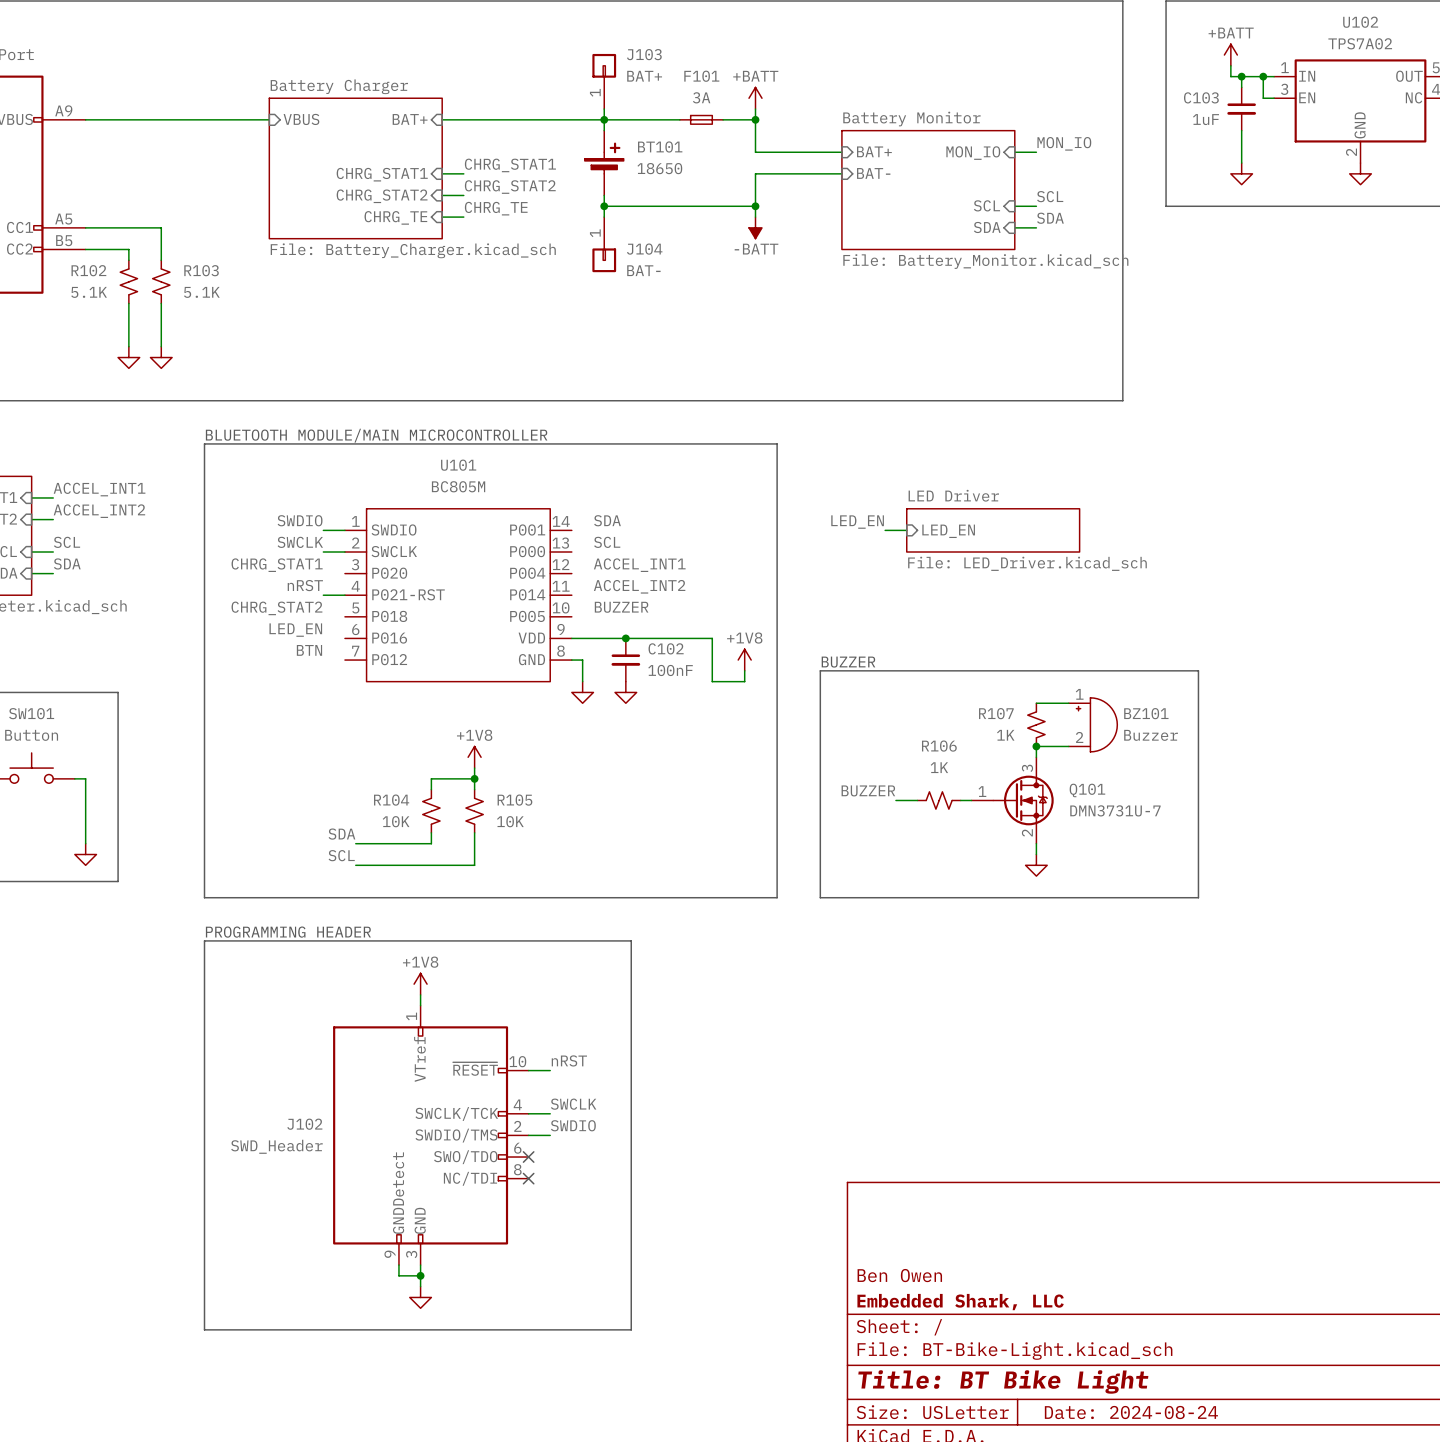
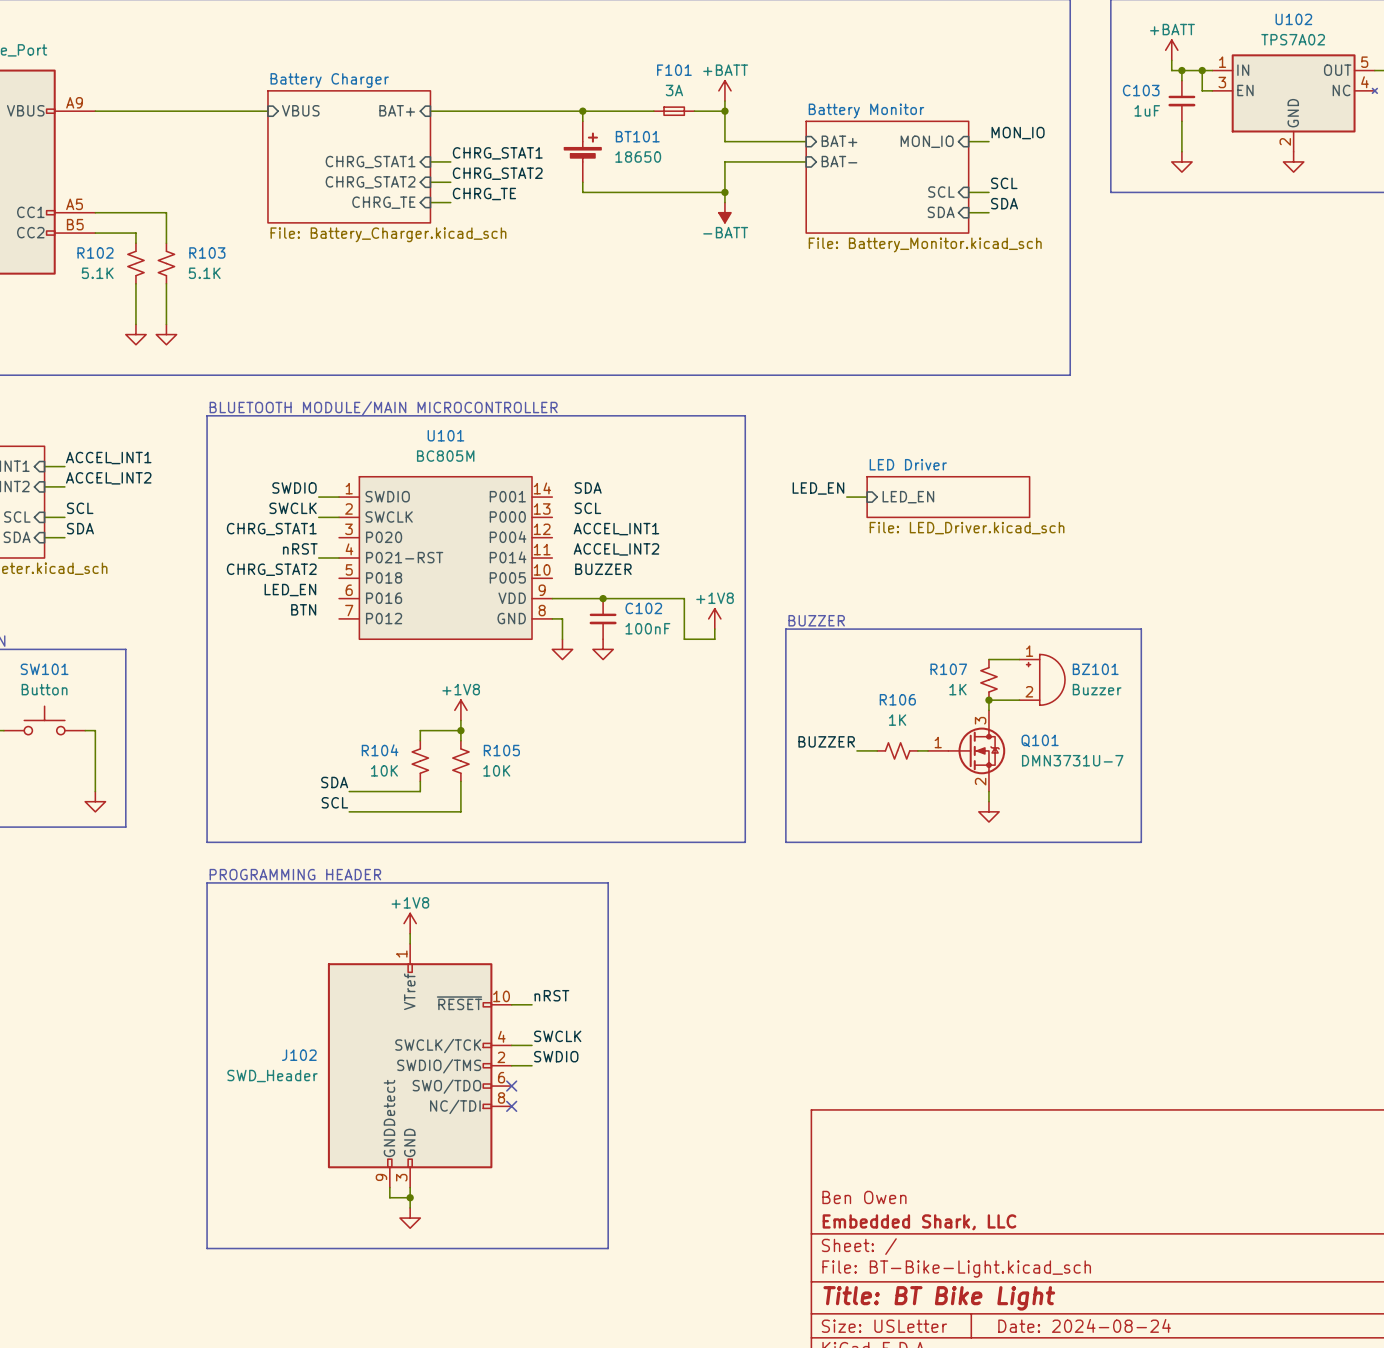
J103: BAT+ (604, 81) -> none
wire: (604, 109) (604, 119) -> none
wire: (604, 206) (604, 217) -> none
junction: (604, 206) -> none
J104: BAT- (604, 244) -> none

